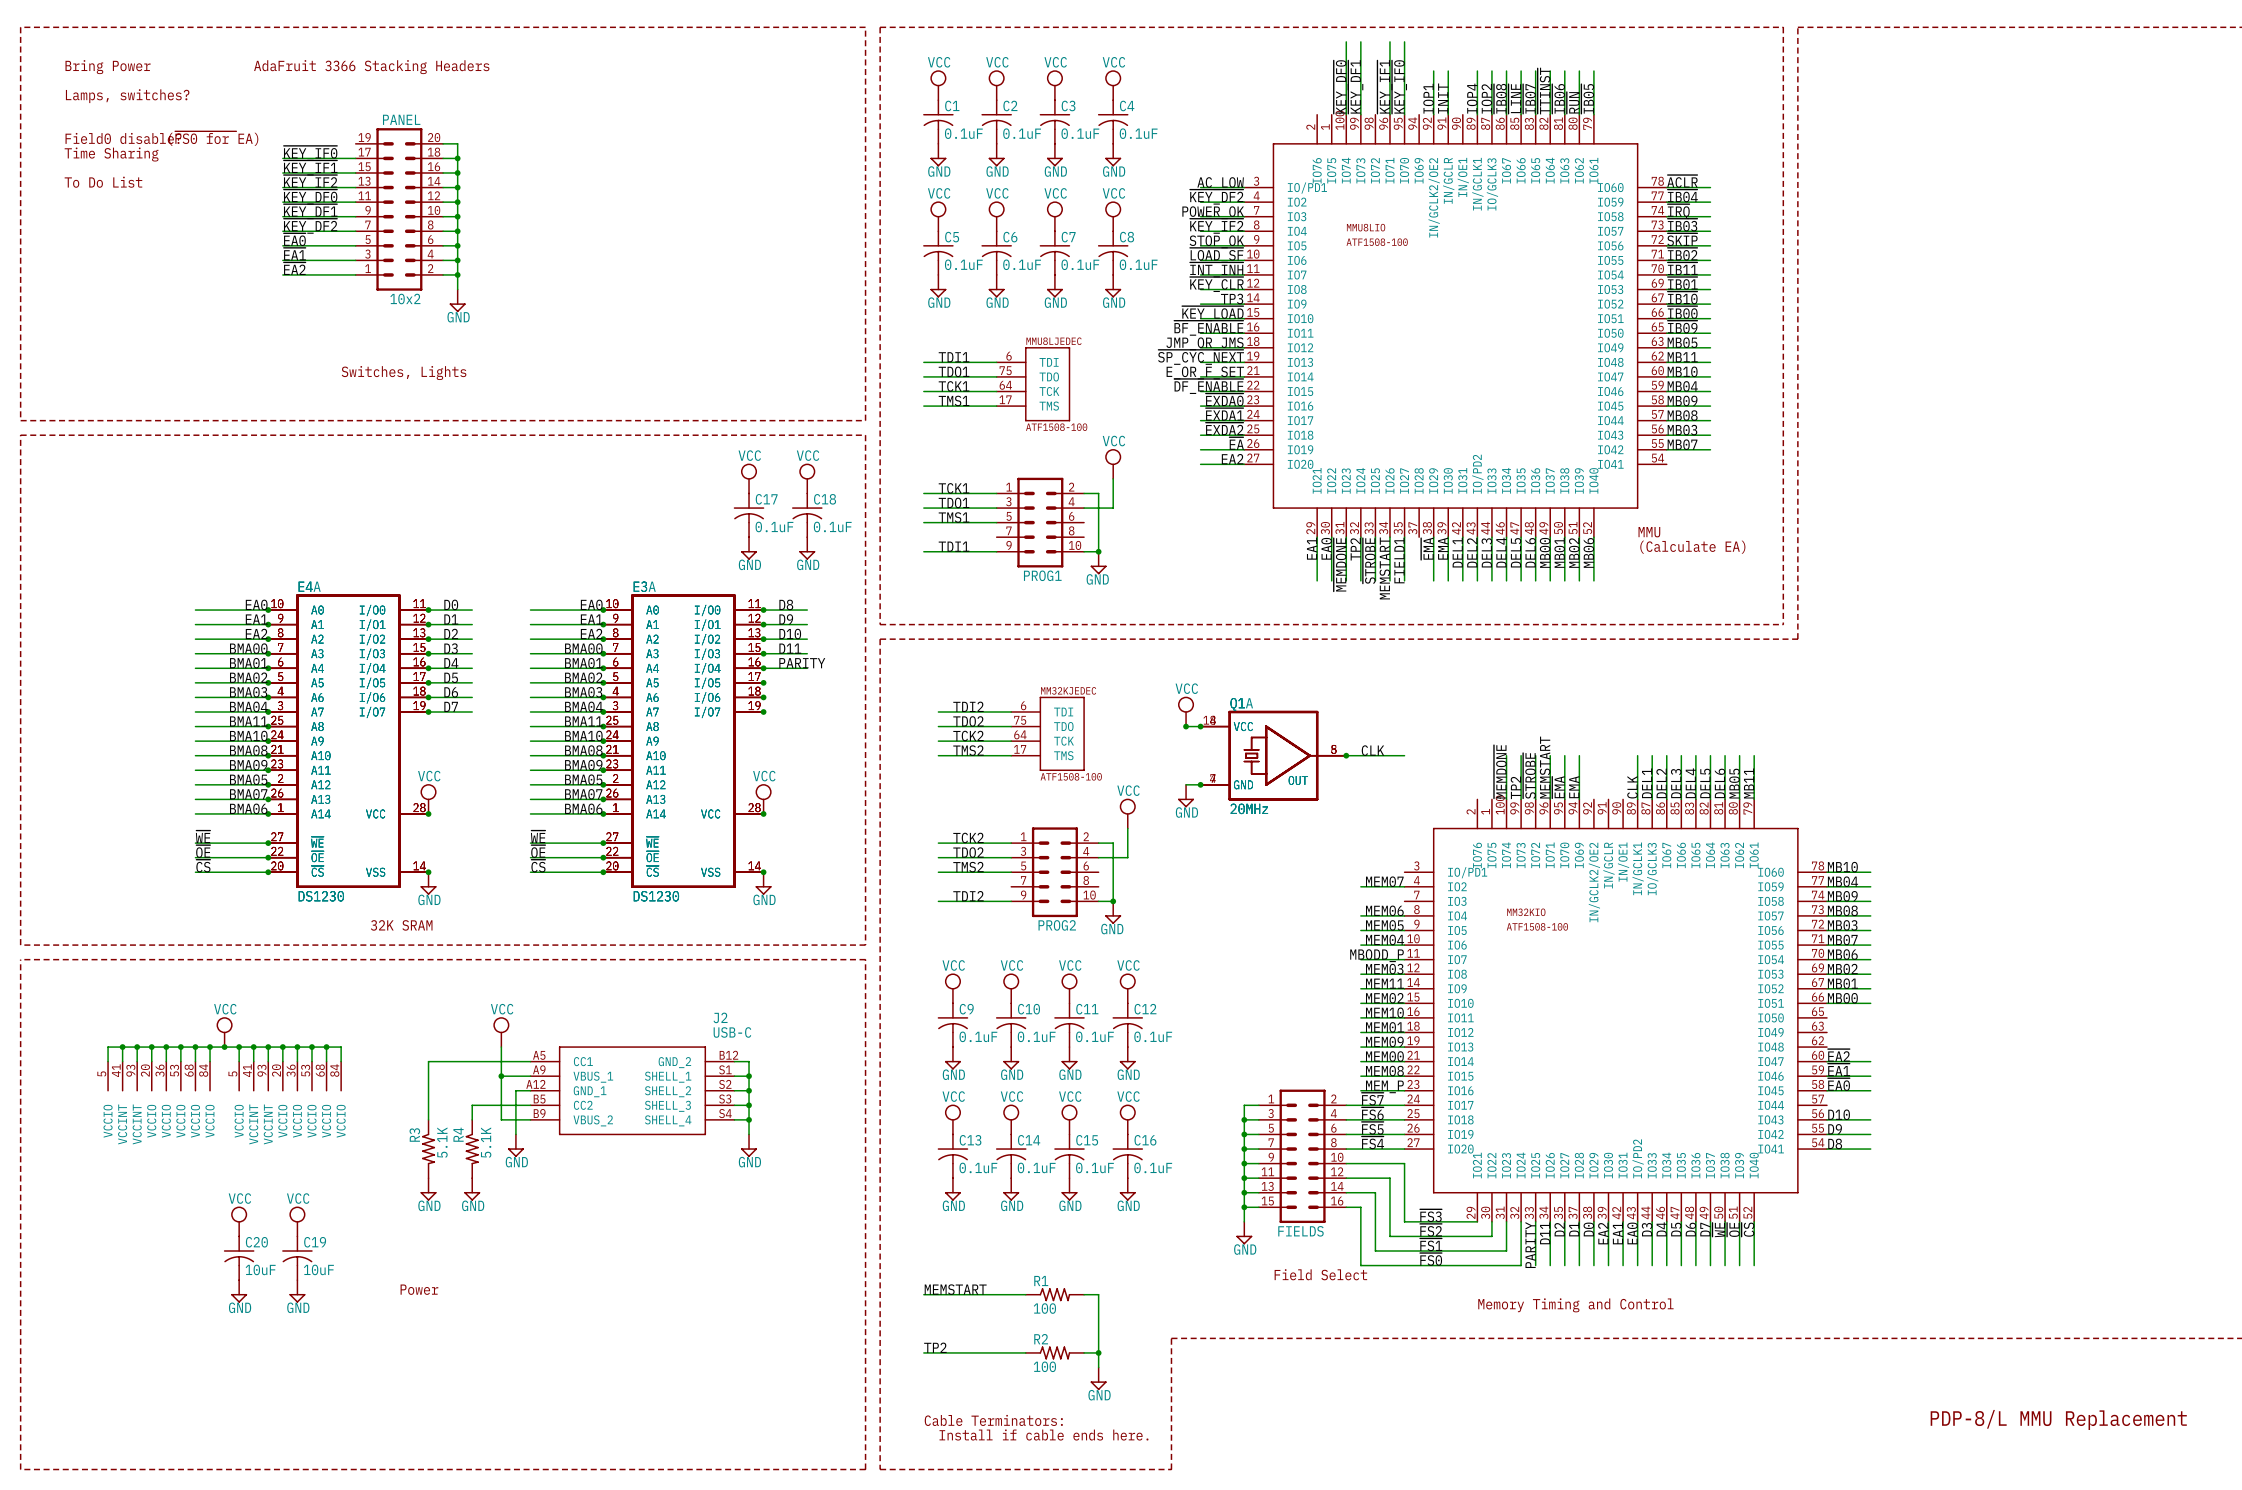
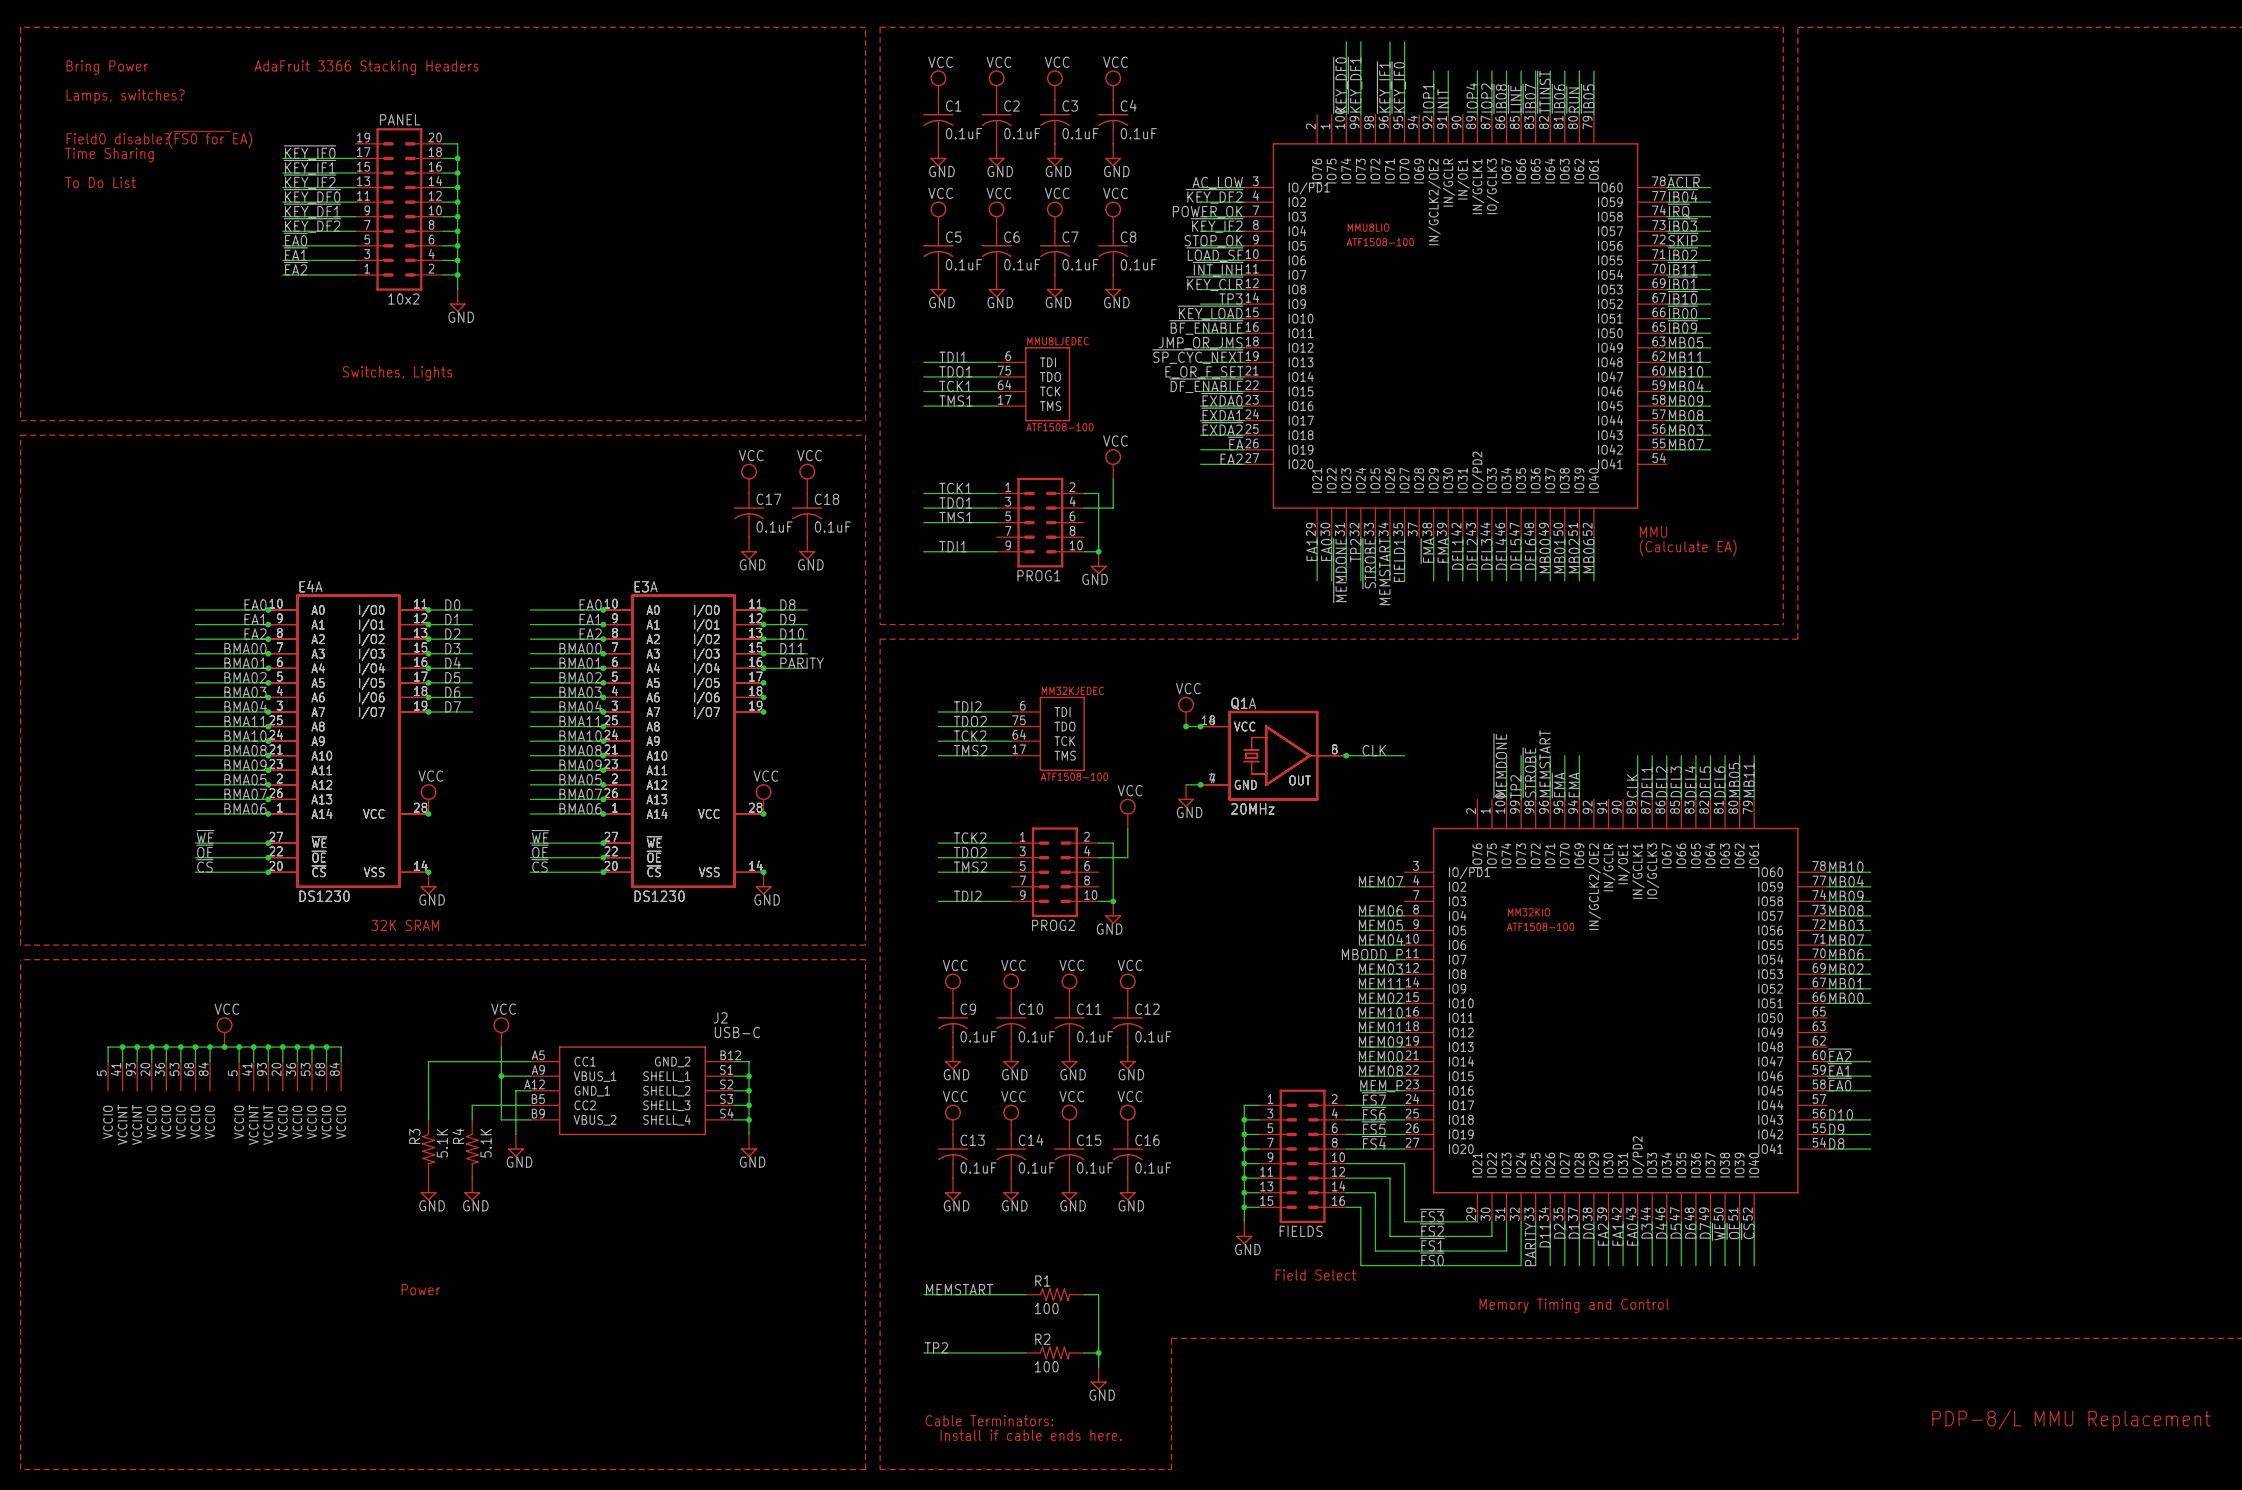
power symbol: VCC (239, 1221) -> none
power symbol: VCC (297, 1221) -> none
C20: 10uF (239, 1258) -> none
C19: 10uF (297, 1258) -> none
power symbol: GND (239, 1291) -> none
power symbol: GND (297, 1291) -> none

